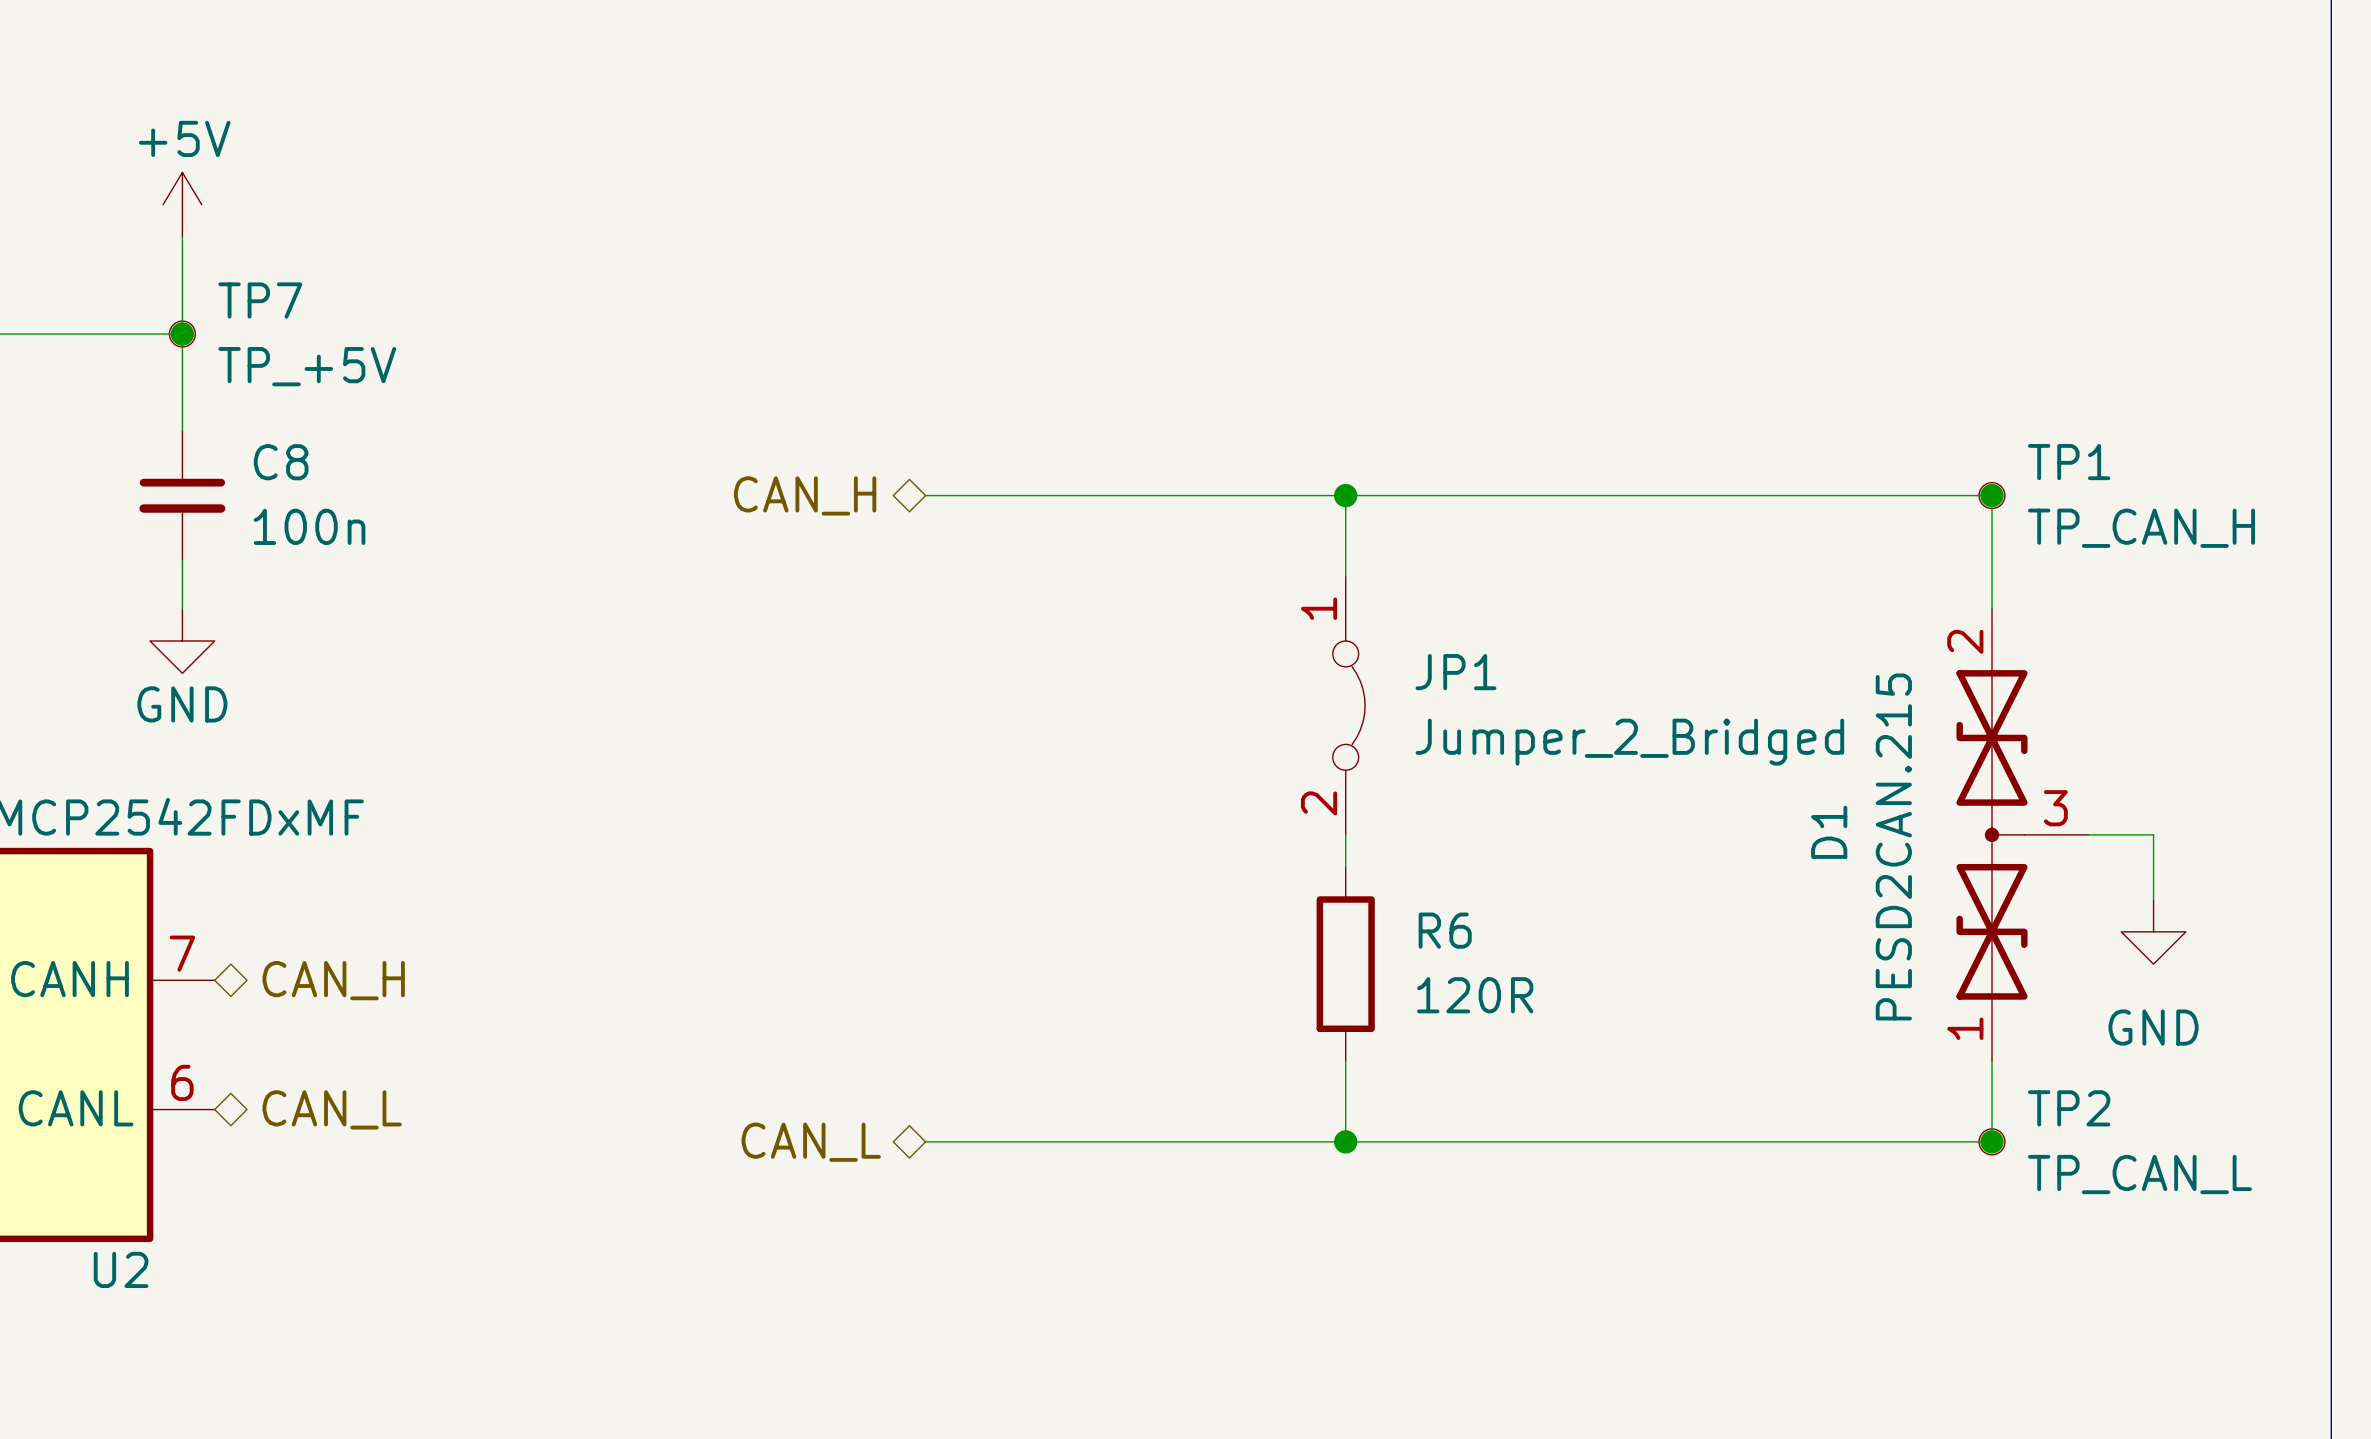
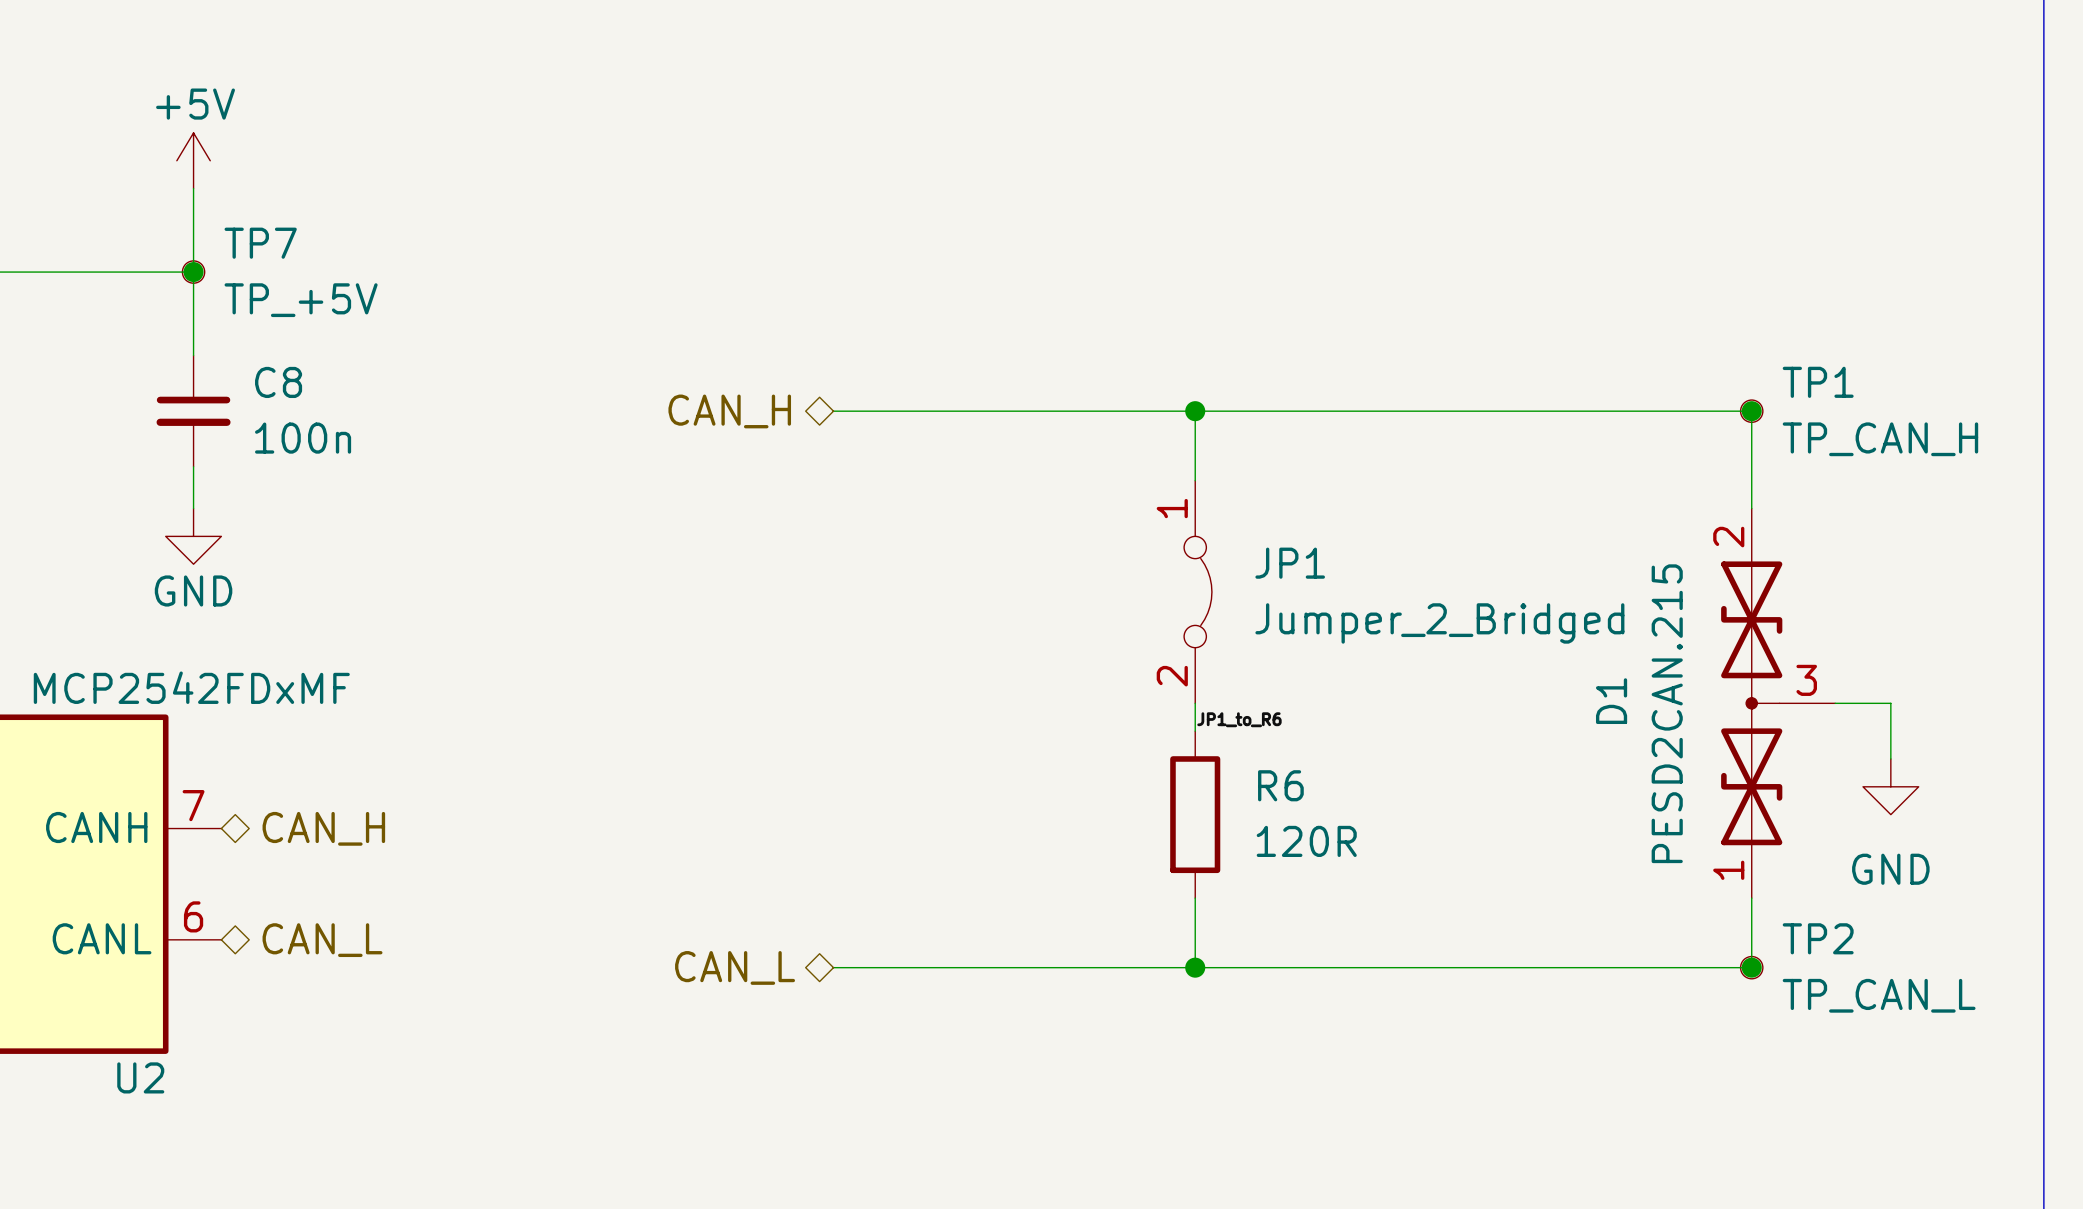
label: none -> JP1_to_R6 (1239, 719)

